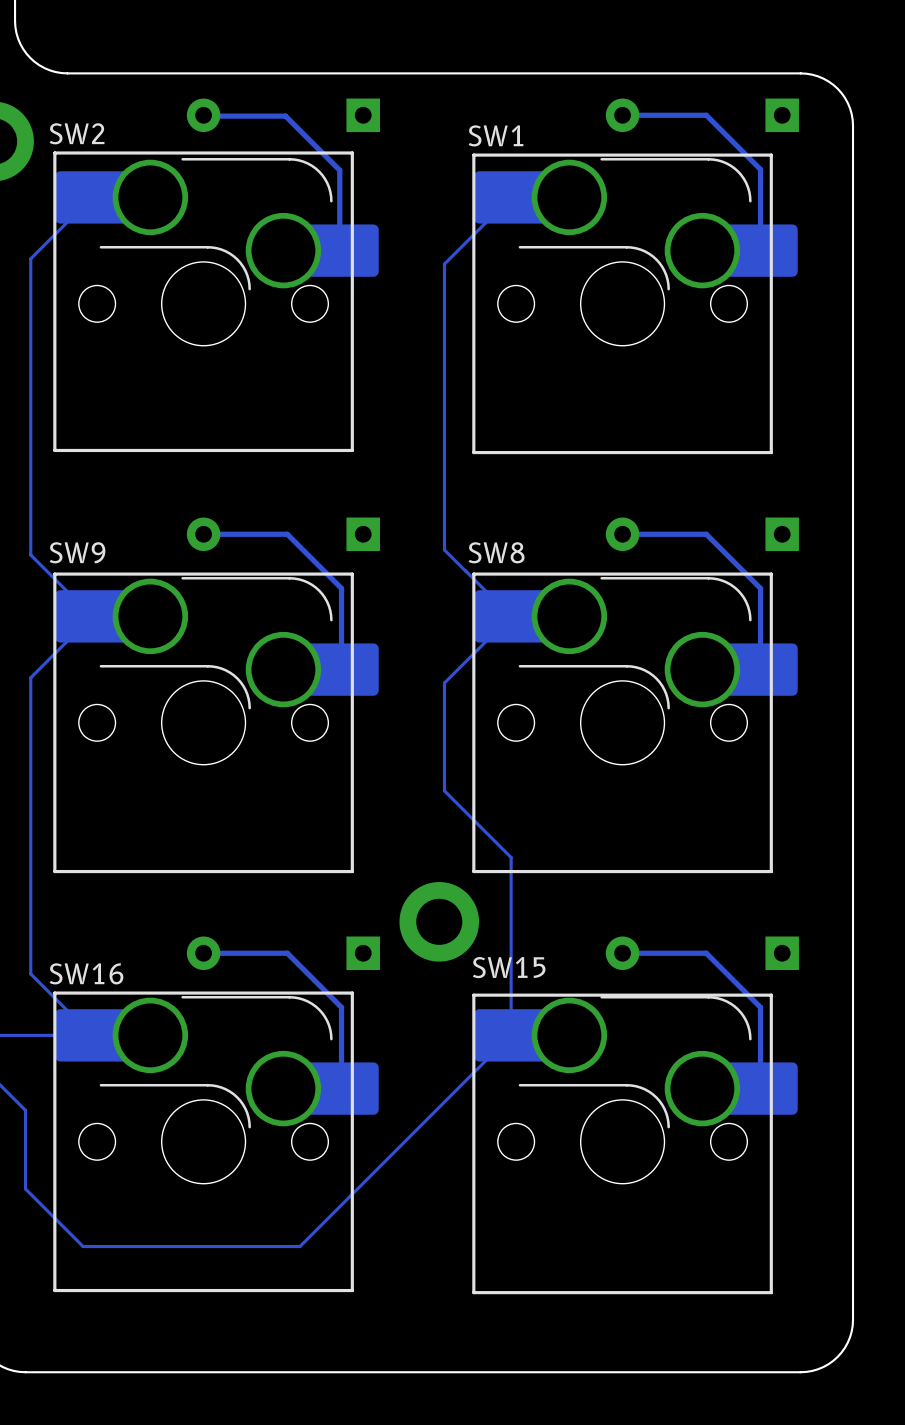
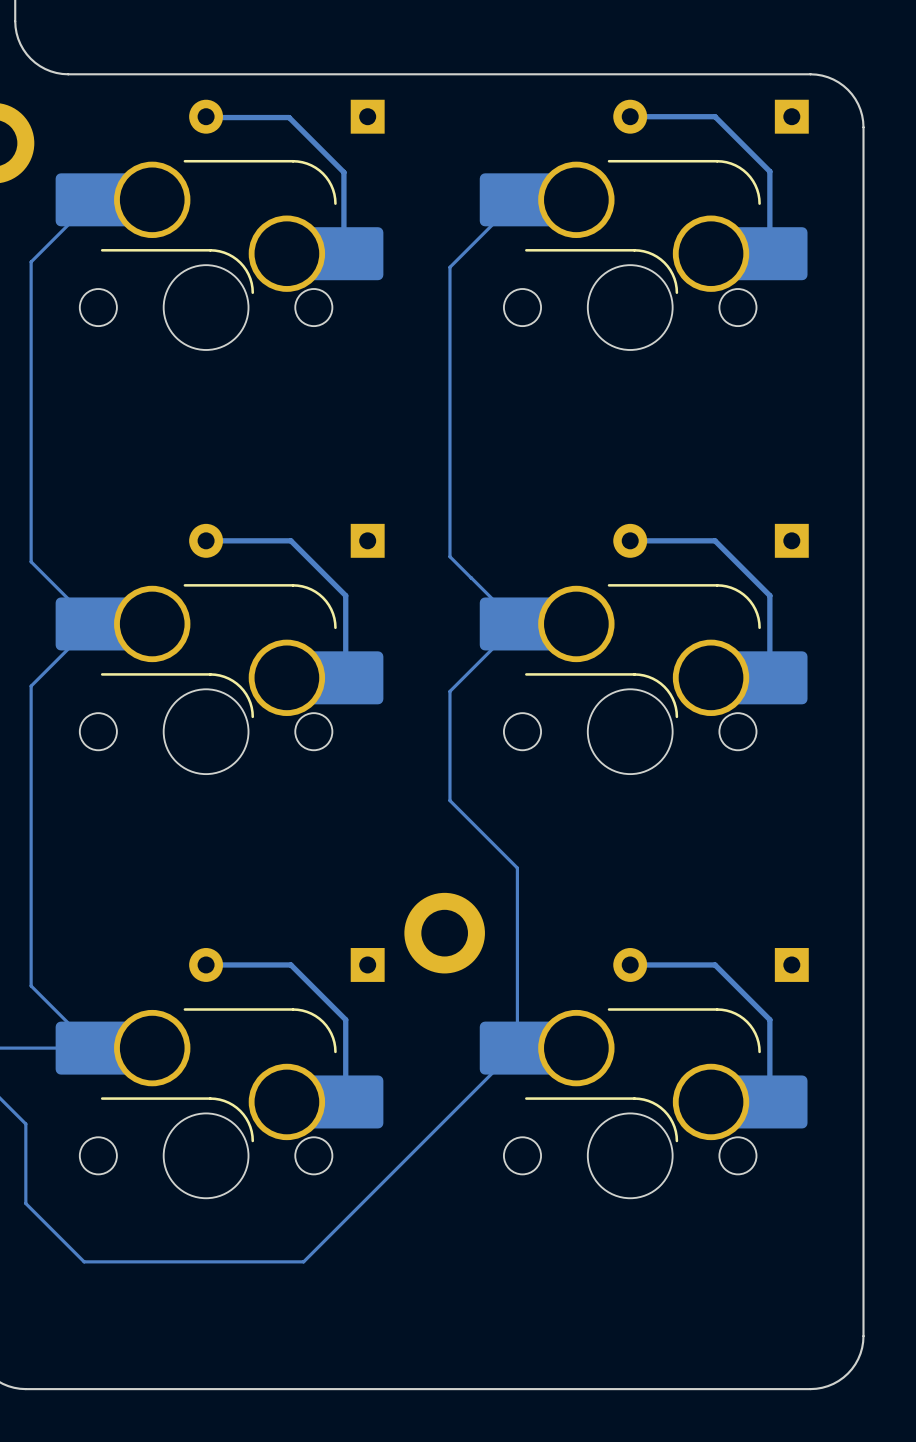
text: SW2 (77, 133) -> none
text: SW1 (496, 135) -> none
line: (352, 152) (352, 450) (54, 450) (54, 152) (352, 152) -> none
line: (771, 155) (771, 452) (473, 452) (473, 155) (771, 155) -> none
text: SW9 (77, 552) -> none
text: SW8 (496, 552) -> none
line: (352, 574) (54, 574) (54, 871) (352, 871) (352, 574) -> none
line: (771, 574) (473, 574) (473, 871) (771, 871) (771, 574) -> none
text: SW15 (509, 967) -> none
text: SW16 (86, 973) -> none
line: (352, 993) (352, 1290) (54, 1290) (54, 993) (352, 993) -> none
line: (771, 995) (473, 995) (473, 1292) (771, 1292) (771, 995) -> none

